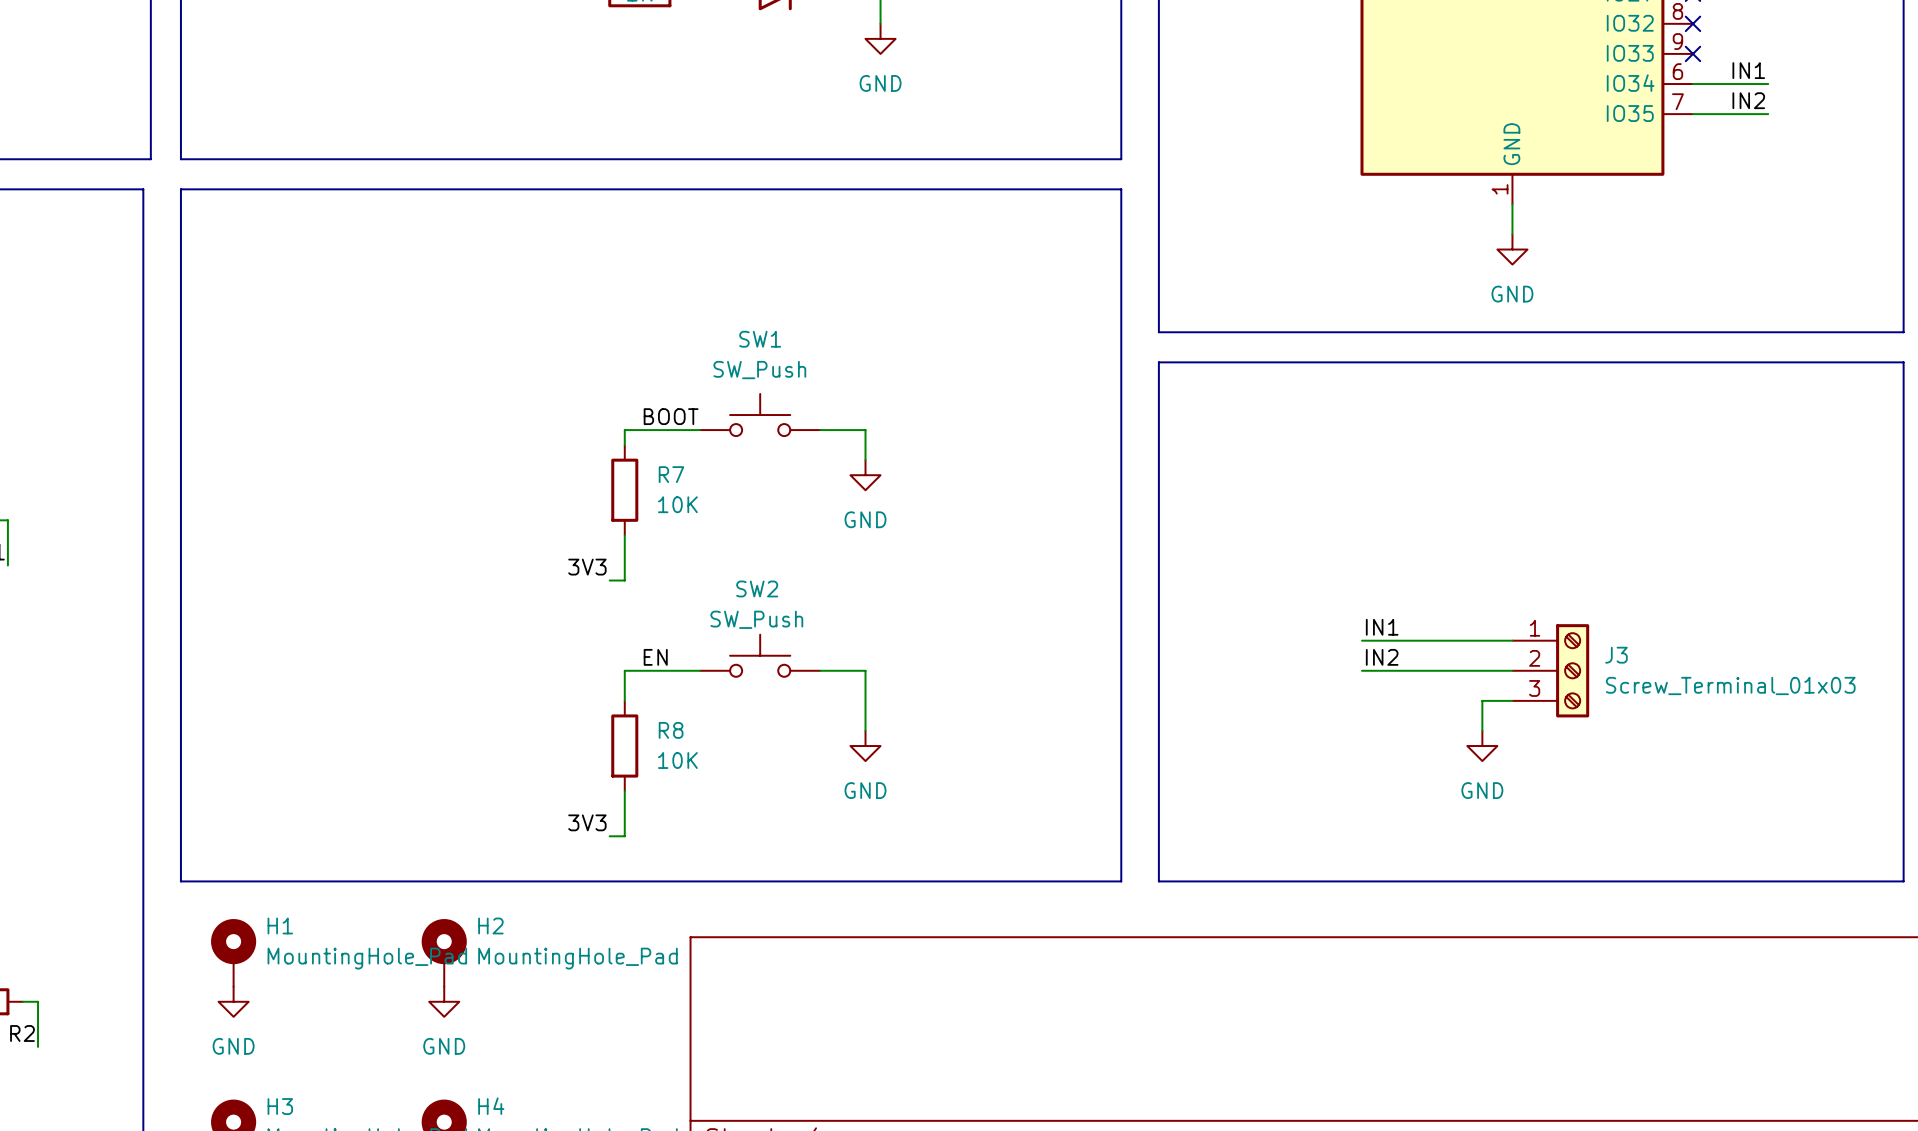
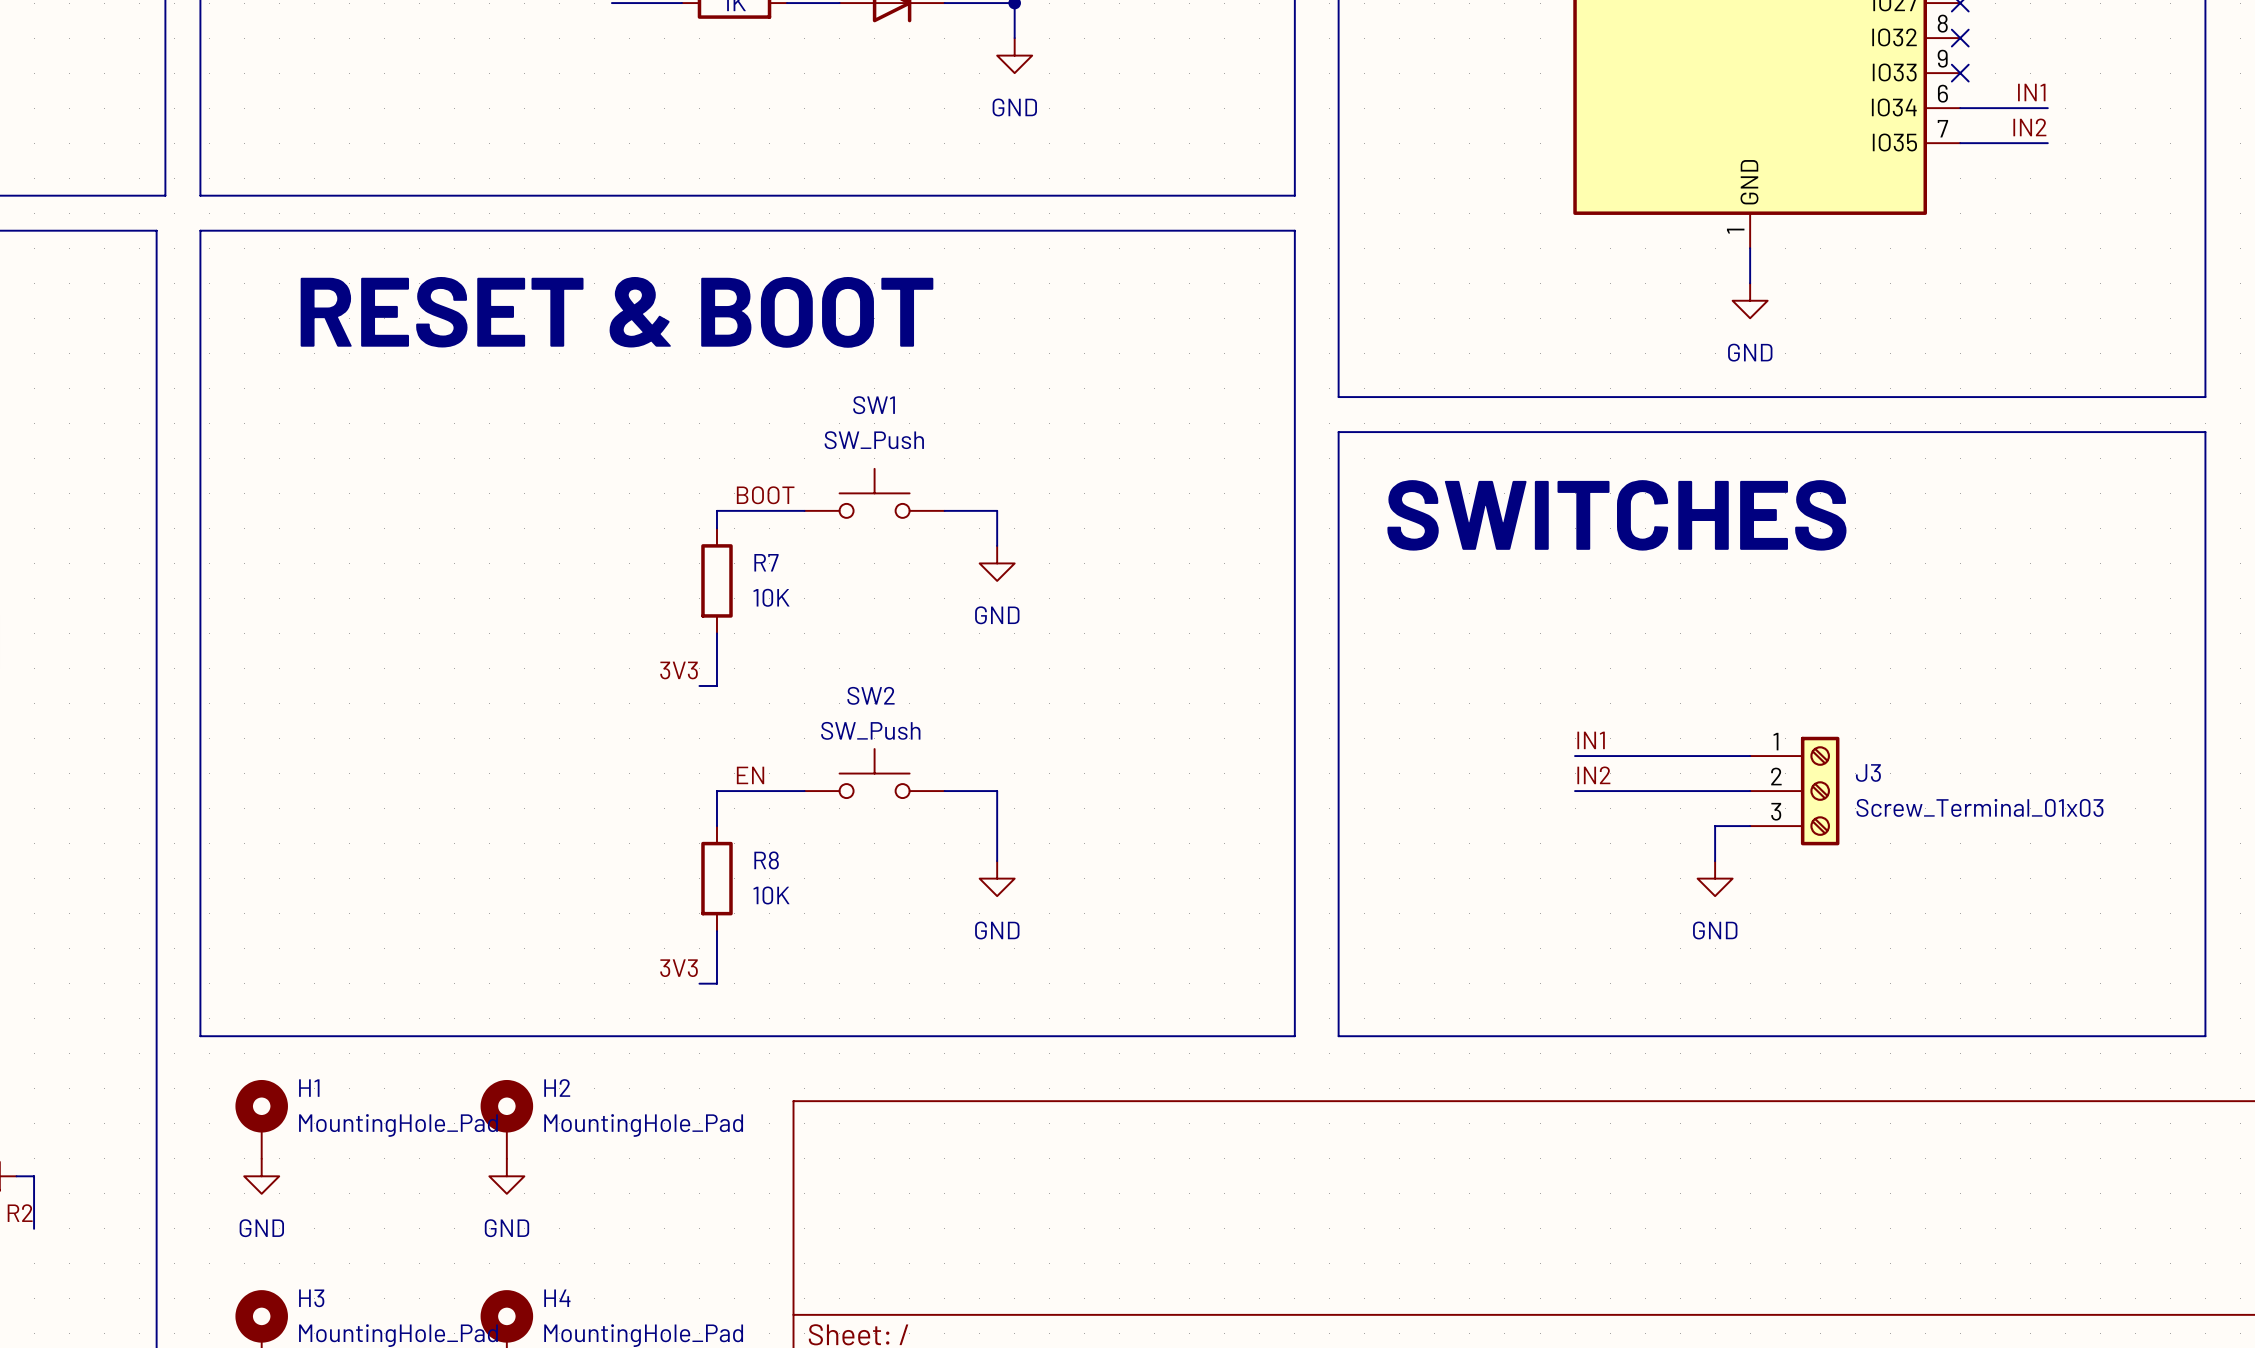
text: none -> RESET & BOOT (616, 312)
text: none -> SWITCHES (1616, 515)

